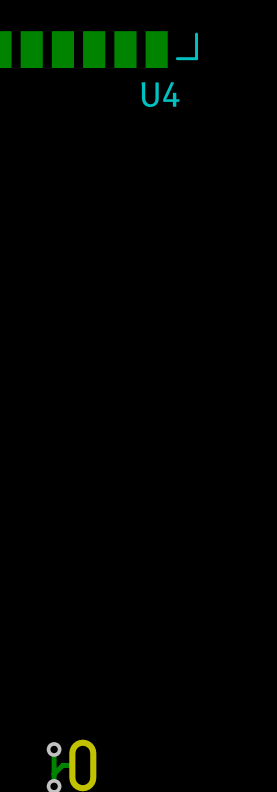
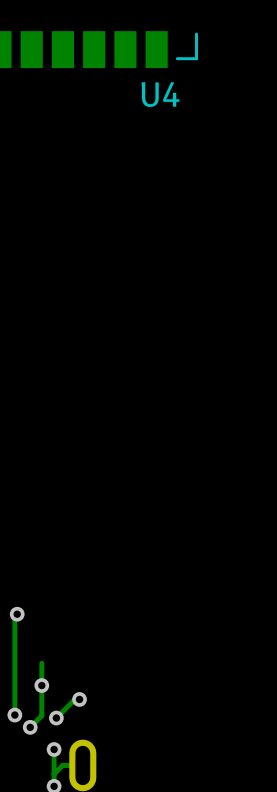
track: none -> (17, 614) (14, 616) (14, 715)
via: none -> (17, 614)
track: none -> (41, 663) (41, 715) (30, 727)
via: none -> (41, 685)
track: none -> (79, 699) (74, 700) (56, 718)
via: none -> (79, 699)
via: none -> (14, 715)
via: none -> (56, 718)
via: none -> (30, 727)

